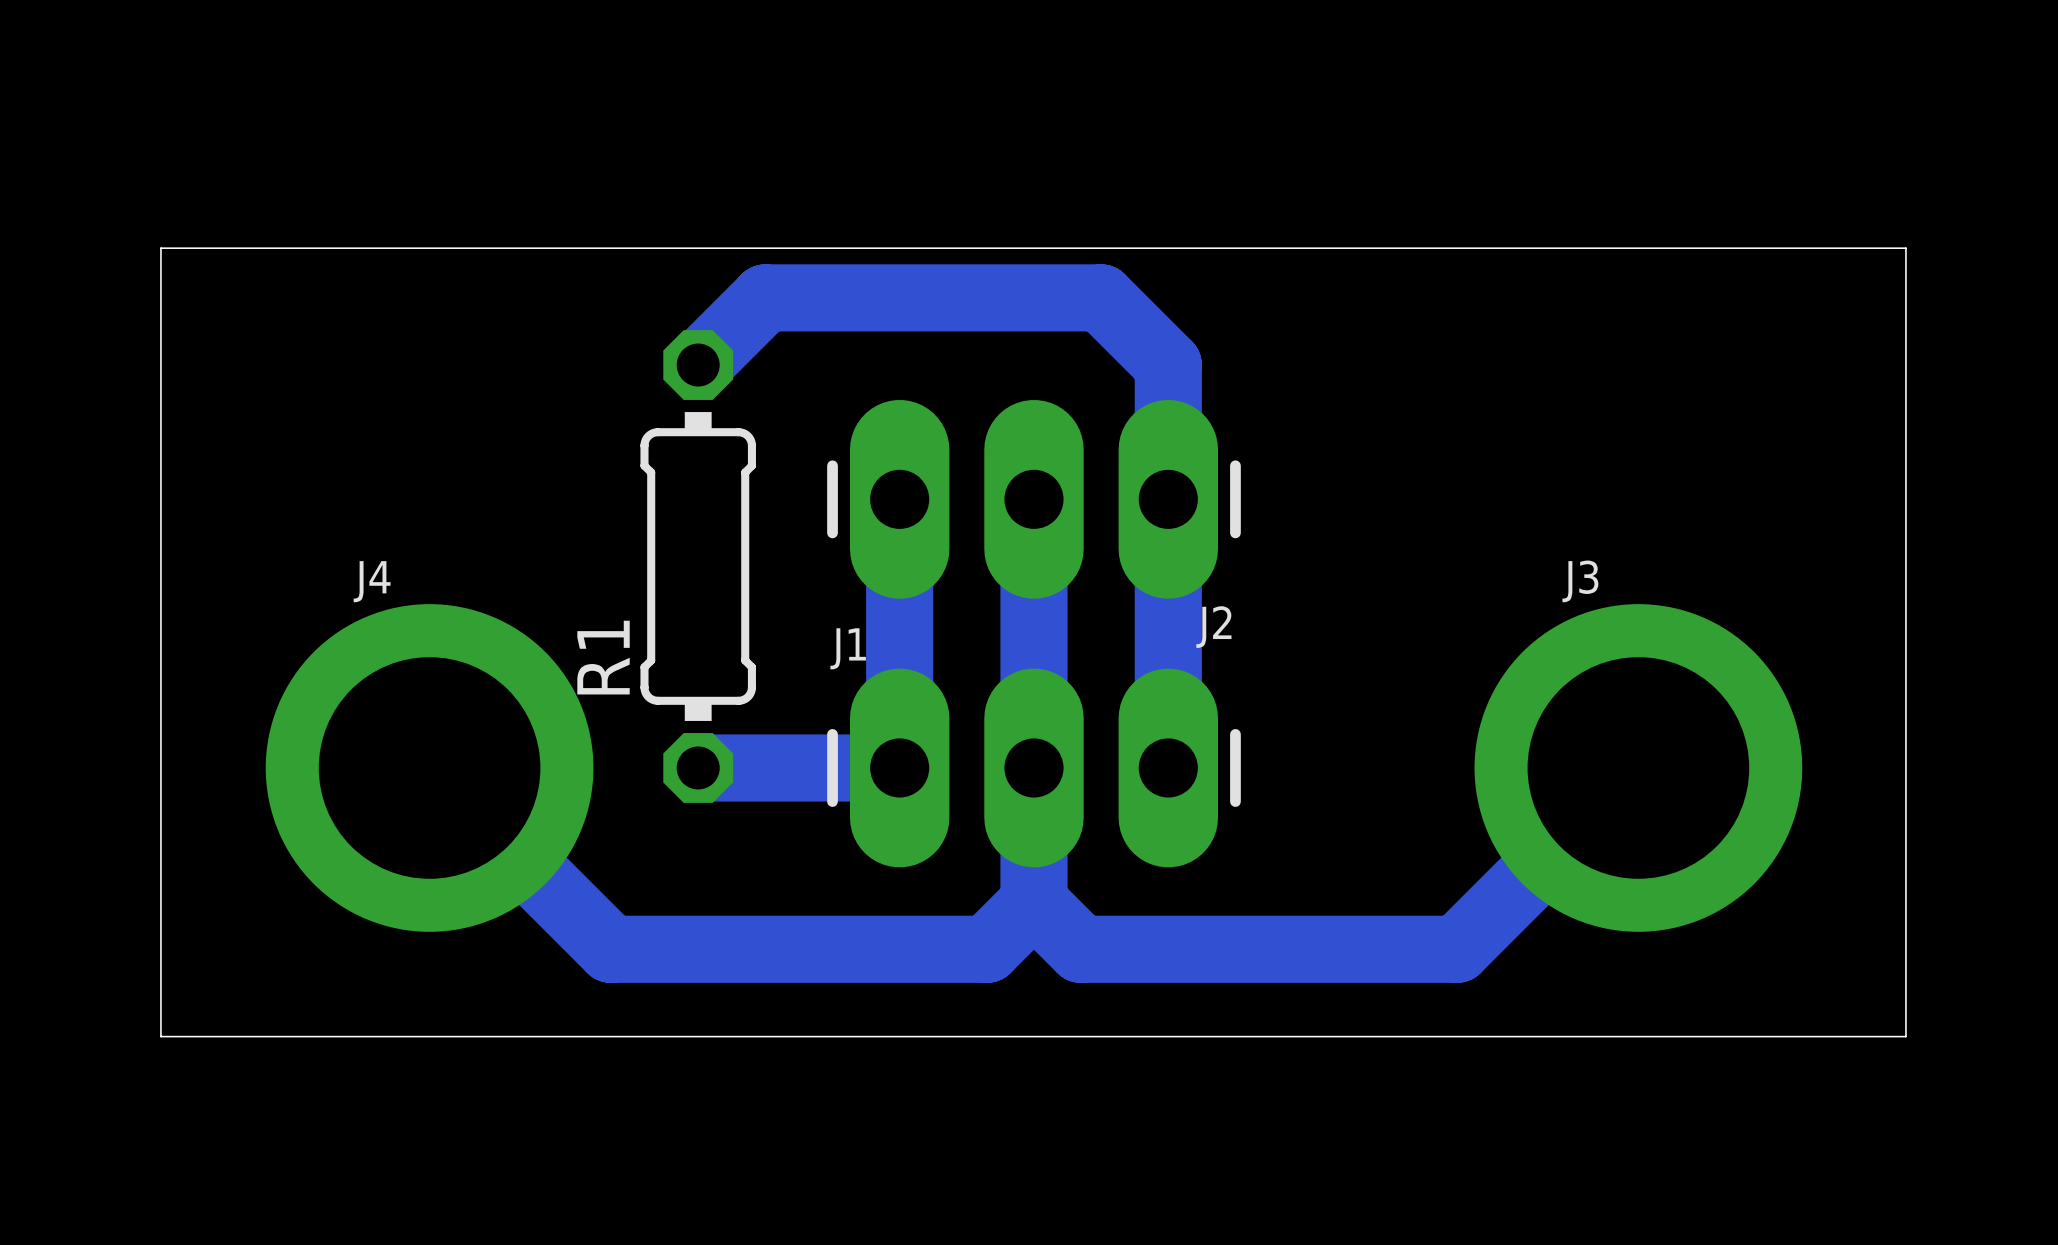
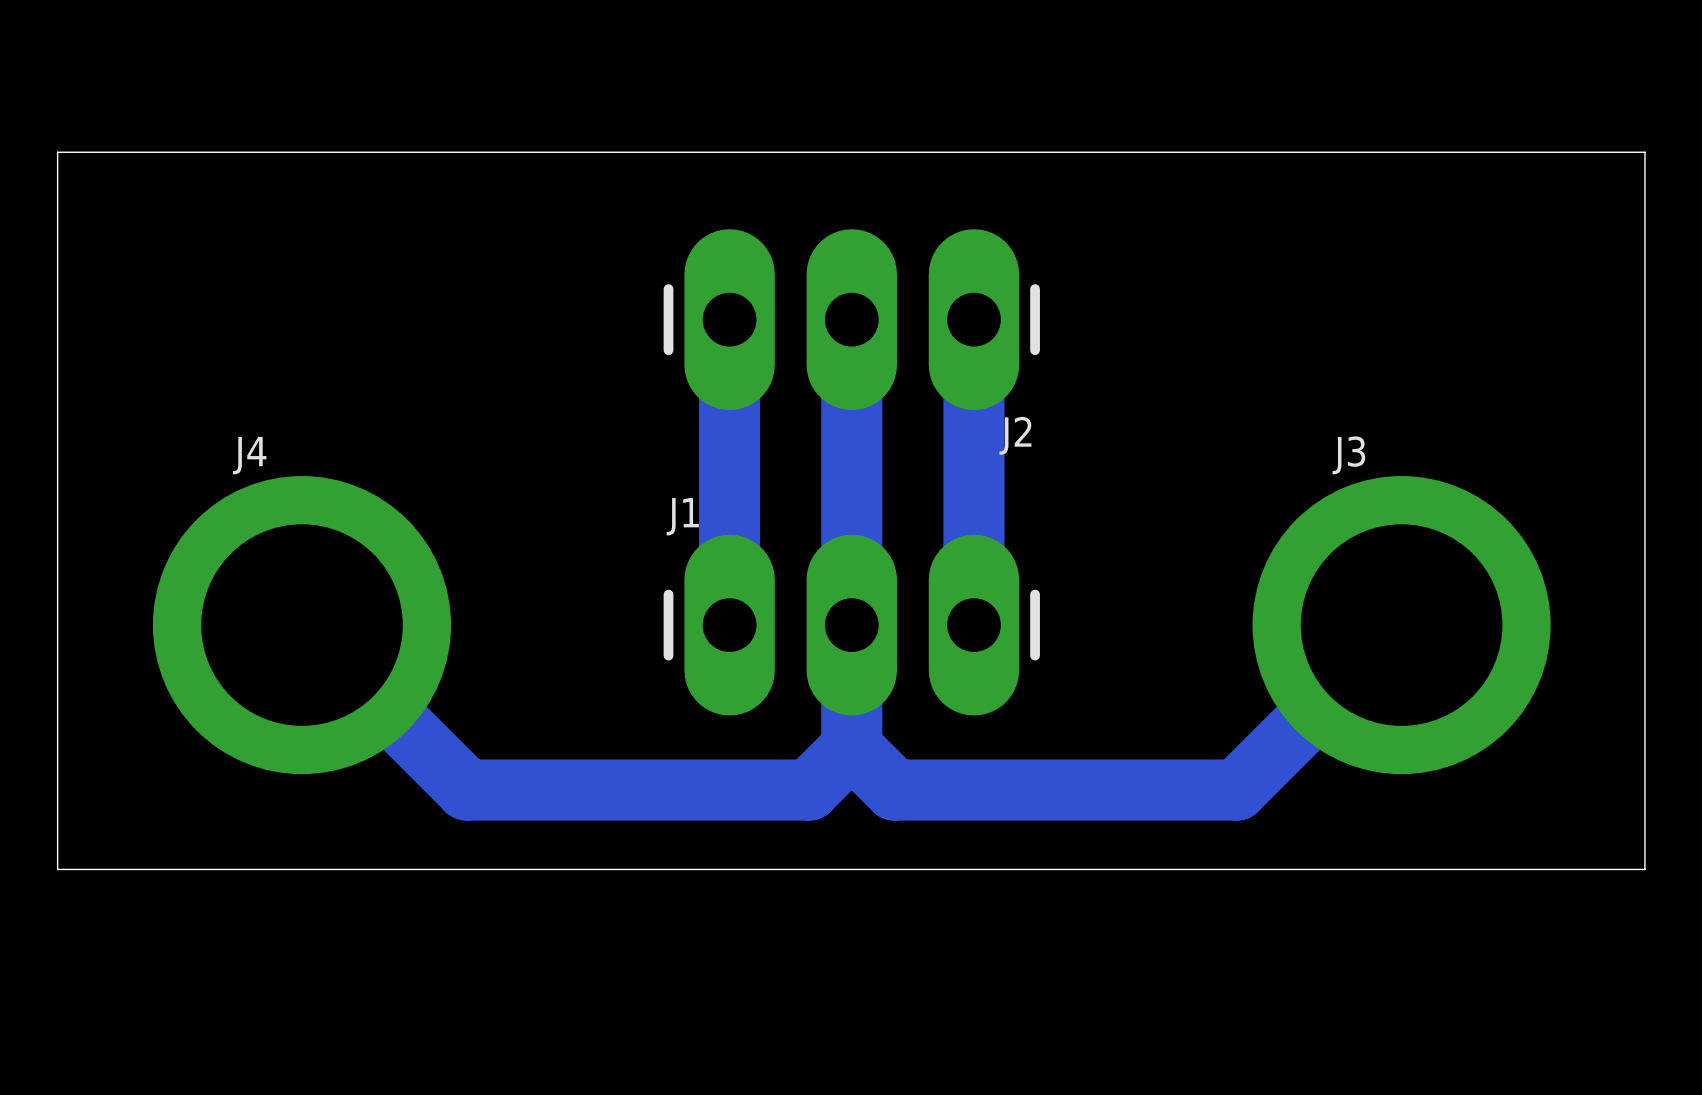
bottom track: (698, 365) (765, 297) (1101, 297) (1168, 365) (1168, 432) -> none
J2 position: (1033, 499) -> (851, 319)
R1: (698, 566) -> none
bottom track: (698, 767) (899, 767) -> none

